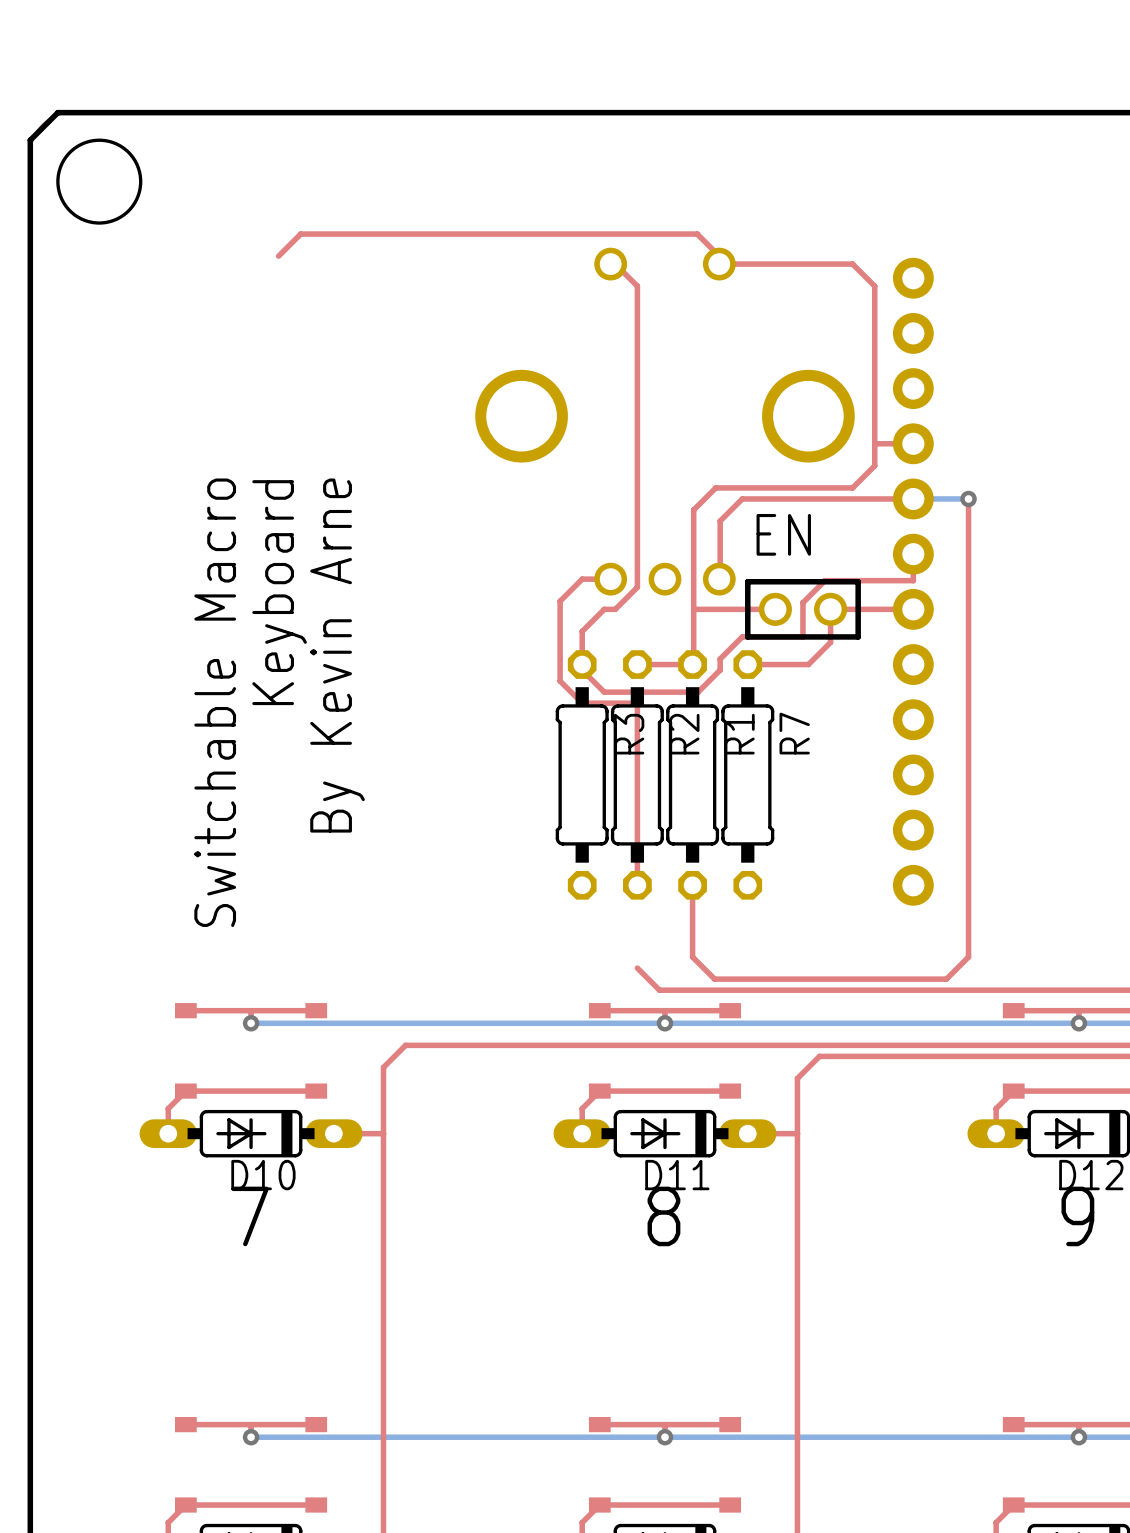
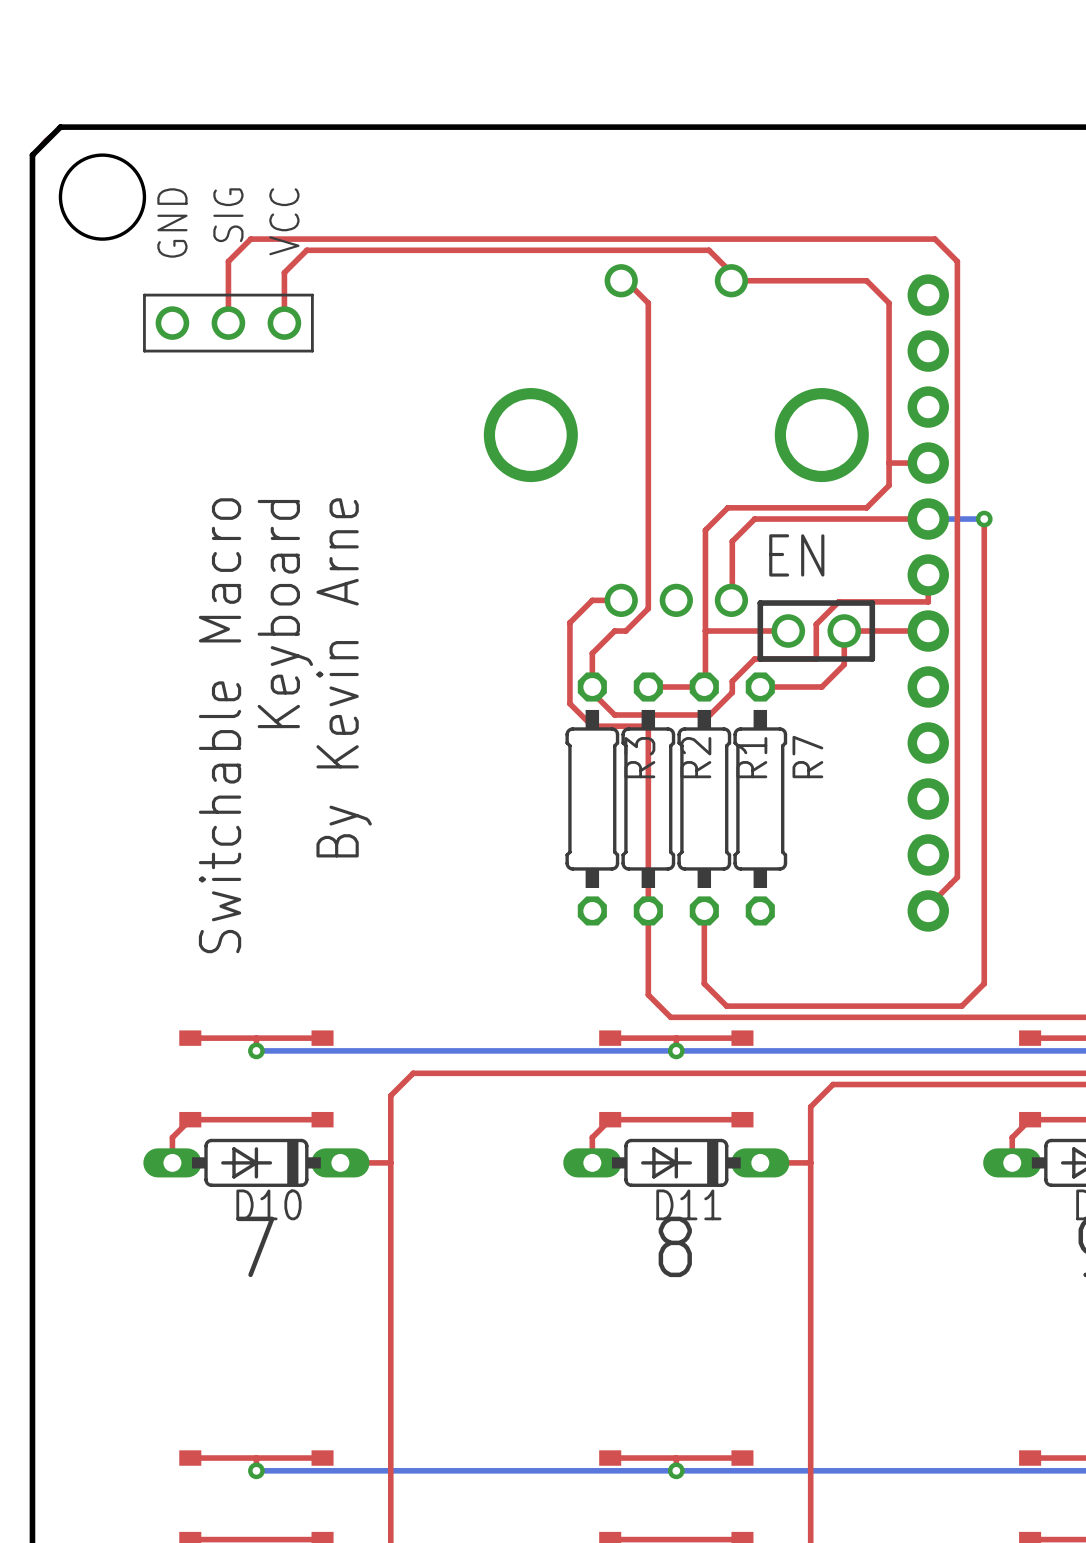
top track: none -> (284, 272) (284, 323)
top track: none -> (228, 323) (228, 261) (250, 239) (934, 239) (957, 261) (957, 877) (928, 906) (928, 910)
part: none -> (228, 323)
top track: none -> (648, 910) (648, 994)

